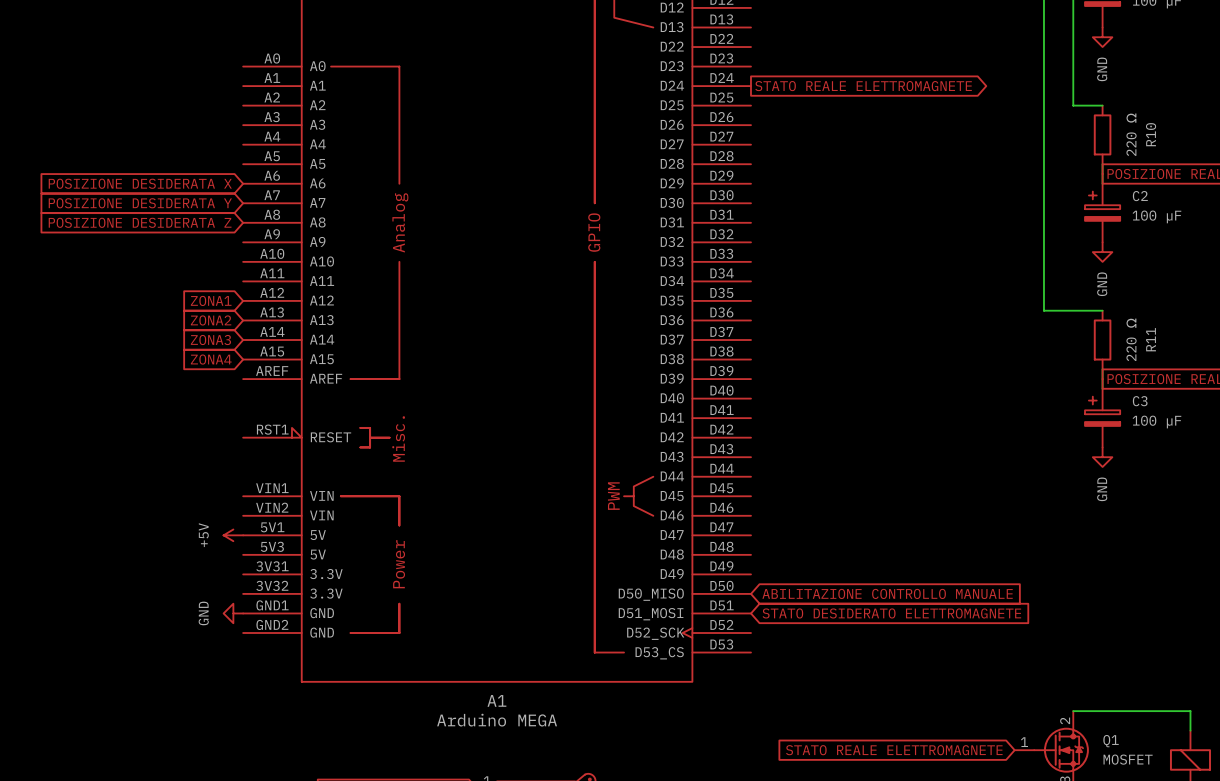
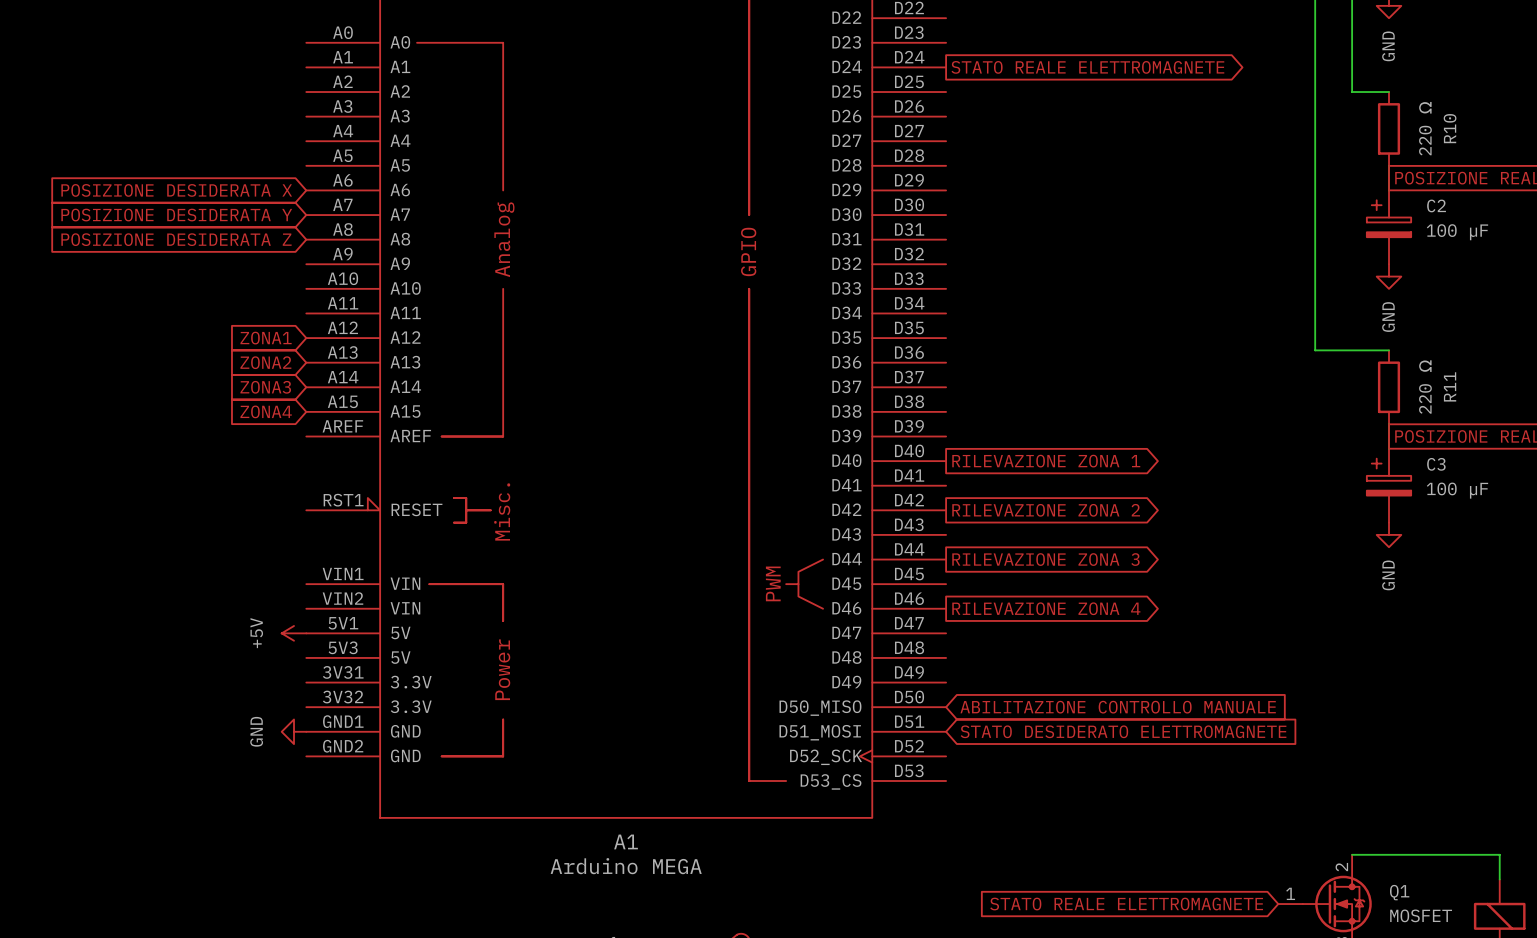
global label: none -> RILEVAZIONE ZONA 1 (1046, 461)
global label: none -> RILEVAZIONE ZONA 2 (1046, 510)
global label: none -> RILEVAZIONE ZONA 3 (1045, 559)
global label: none -> RILEVAZIONE ZONA 4 (1046, 608)

